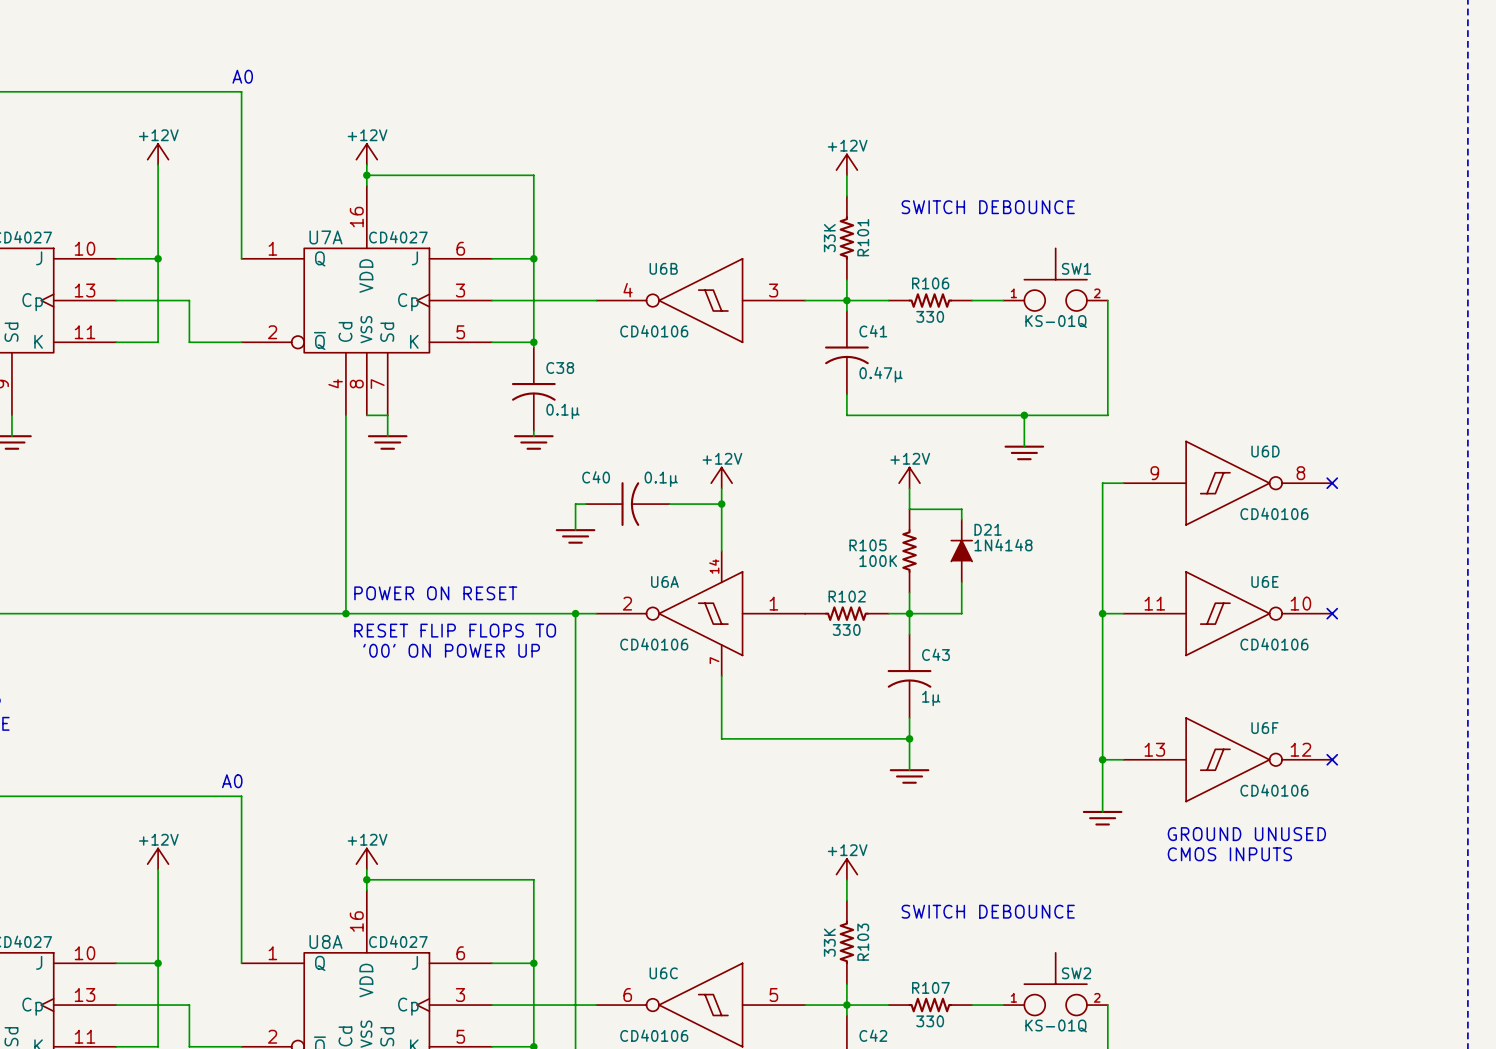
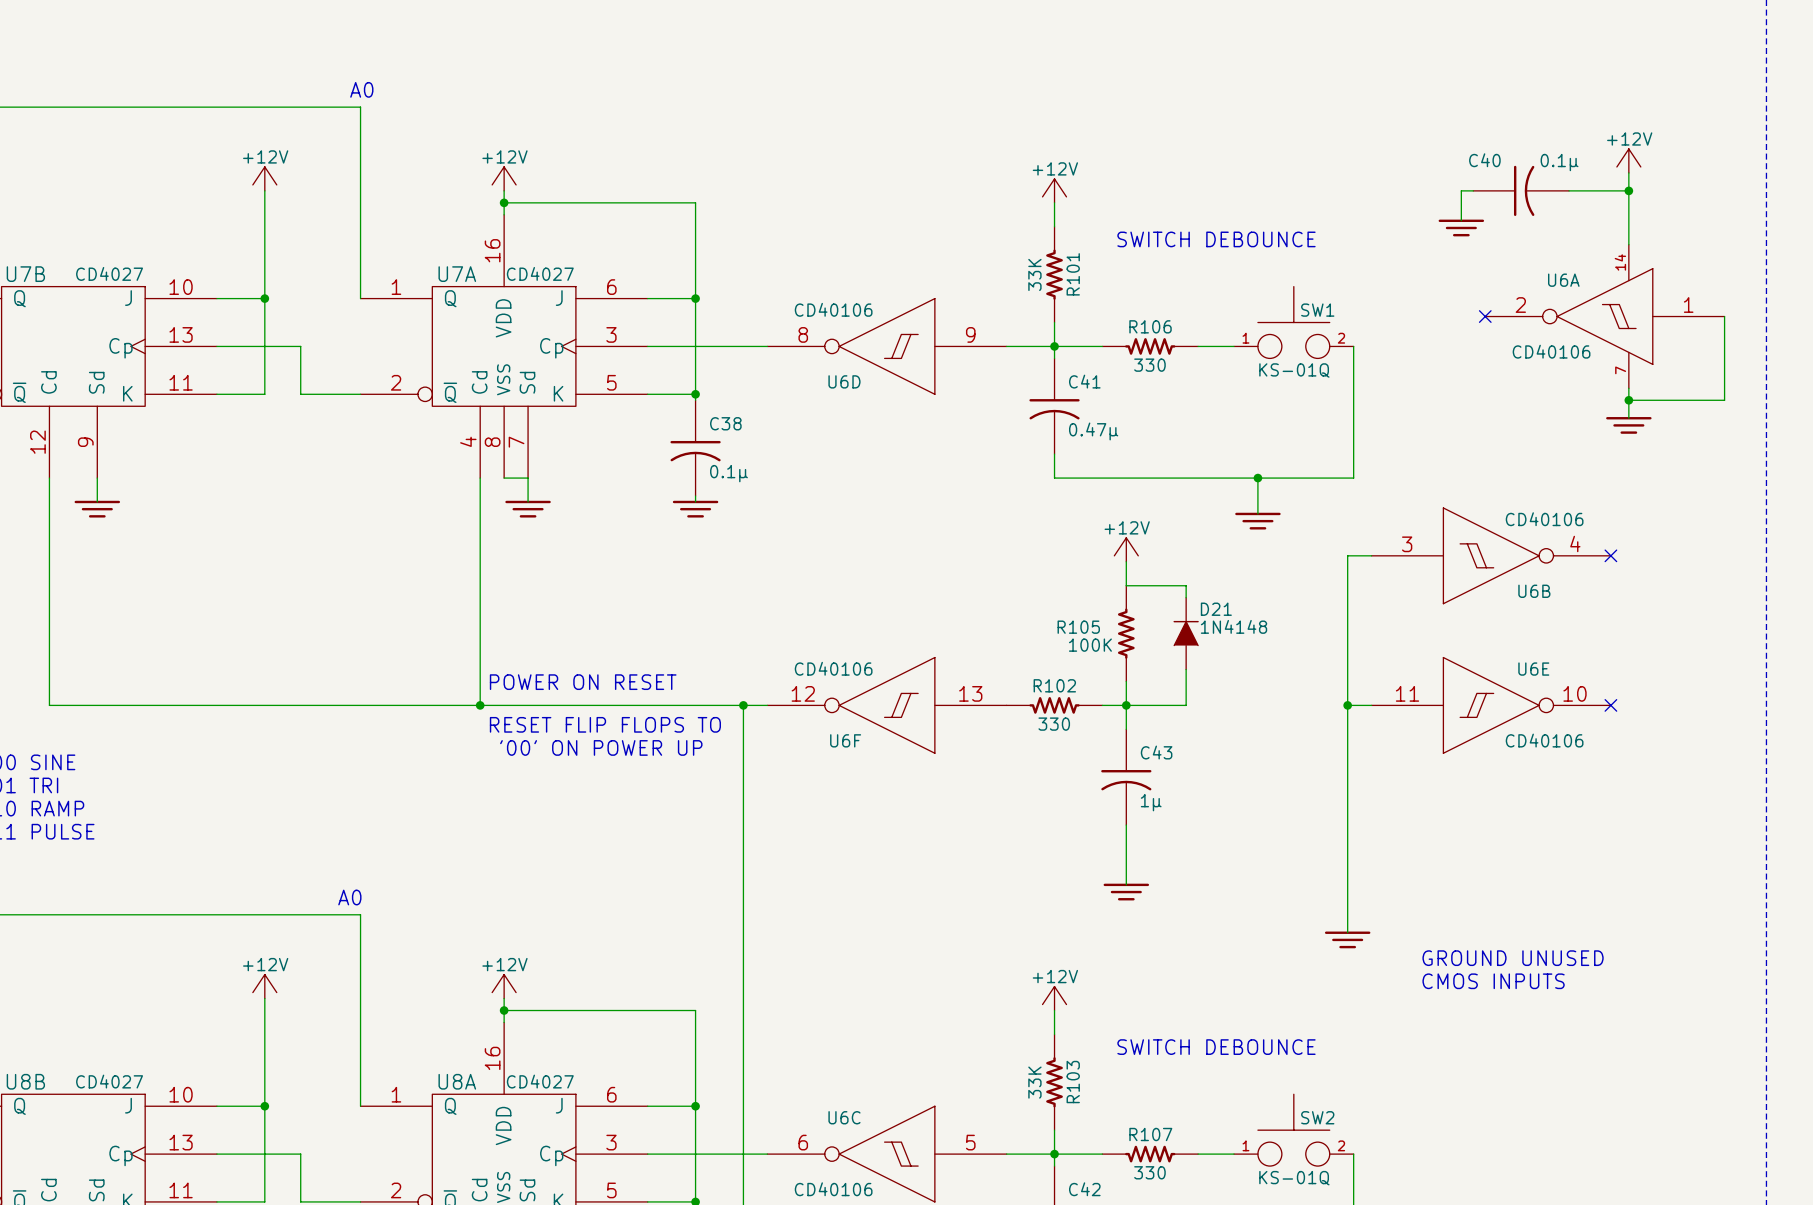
power symbol: none -> +12V (1628, 160)
wire: none -> (1628, 172) (1628, 244)
wire: none -> (1473, 190) (1461, 190) (1461, 220)
wire: none -> (1569, 190) (1628, 190)
junction: none -> (1628, 190)
power symbol: none -> (1461, 227)
no-connect mark: none -> (1485, 316)
wire: none -> (1724, 316) (1724, 400) (1628, 400)
U6B rotation: 0° (700, 300) -> 180° (1491, 555)
U6B position: (700, 300) -> (1491, 555)
wire: none -> (1628, 388) (1628, 418)
junction: none -> (1628, 400)
power symbol: none -> (1628, 425)
power symbol: +12V (721, 477) -> none
U6D rotation: 0° (1227, 483) -> 180° (887, 346)
U6D position: (1227, 483) -> (887, 346)
wire: (721, 488) (721, 551) -> none
wire: (586, 504) (575, 504) (575, 530) -> none
C40 position: (627, 504) -> (1521, 190)
wire: (669, 504) (721, 504) -> none
junction: (721, 504) -> none
power symbol: (575, 536) -> none
U6A position: (700, 613) -> (1604, 316)
wire: (721, 676) (721, 738) (909, 738) -> none
junction: (909, 738) -> none
wire: (1102, 759) (1123, 759) -> none
junction: (1102, 759) -> none
U6F rotation: 0° (1227, 759) -> 180° (887, 705)
U6F position: (1227, 759) -> (887, 705)
no-connect mark: (1332, 759) -> none

